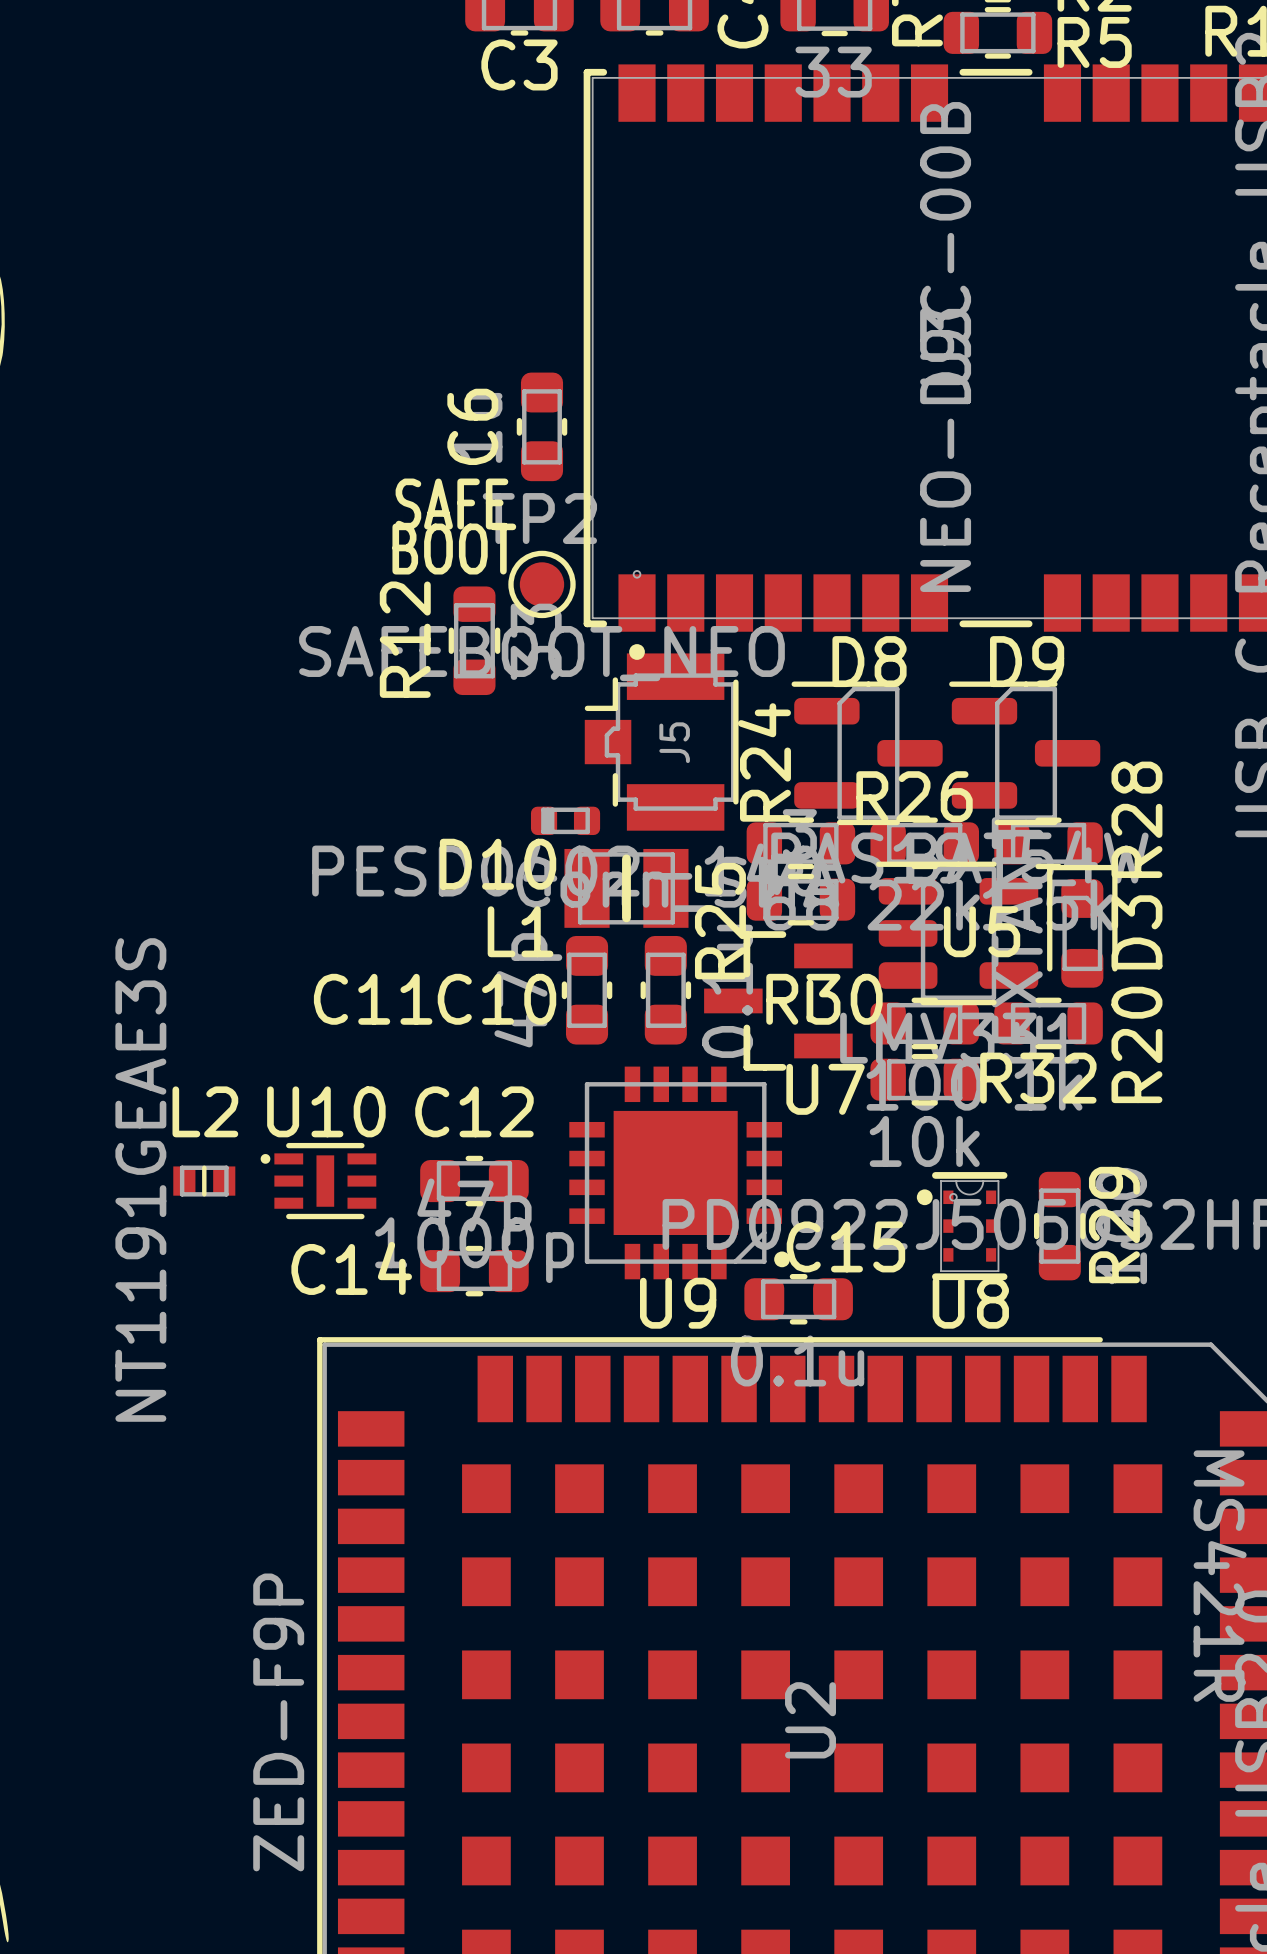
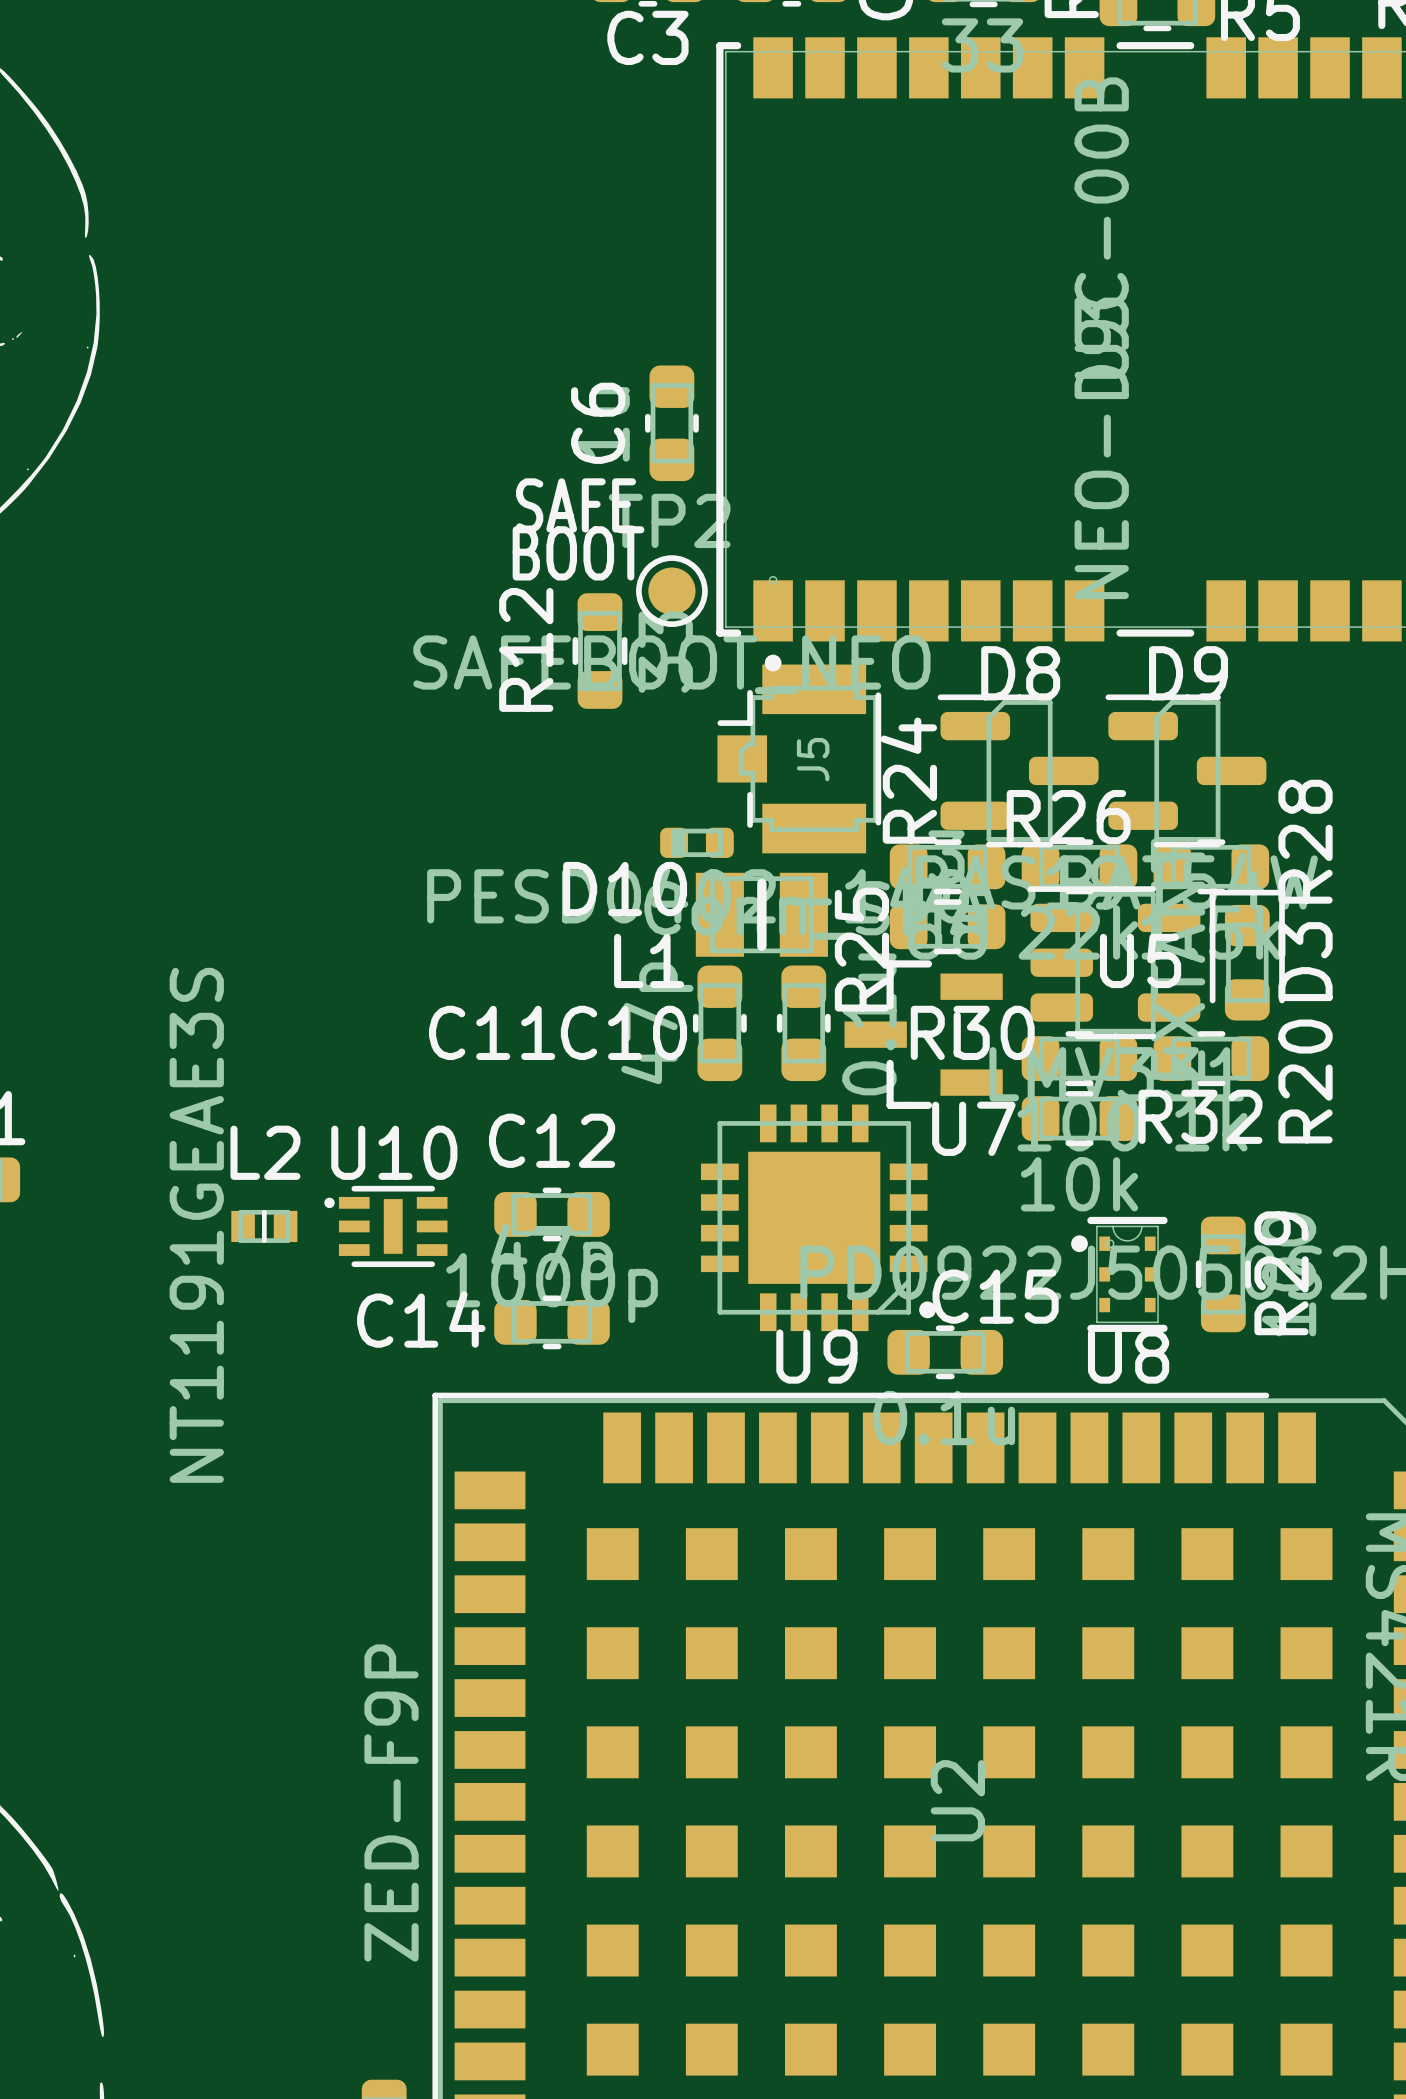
L2 position: (204, 1181) -> (264, 1226)
U10 position: (318, 1181) -> (385, 1226)
C12 position: (474, 1181) -> (552, 1214)
C14 position: (474, 1271) -> (552, 1322)

